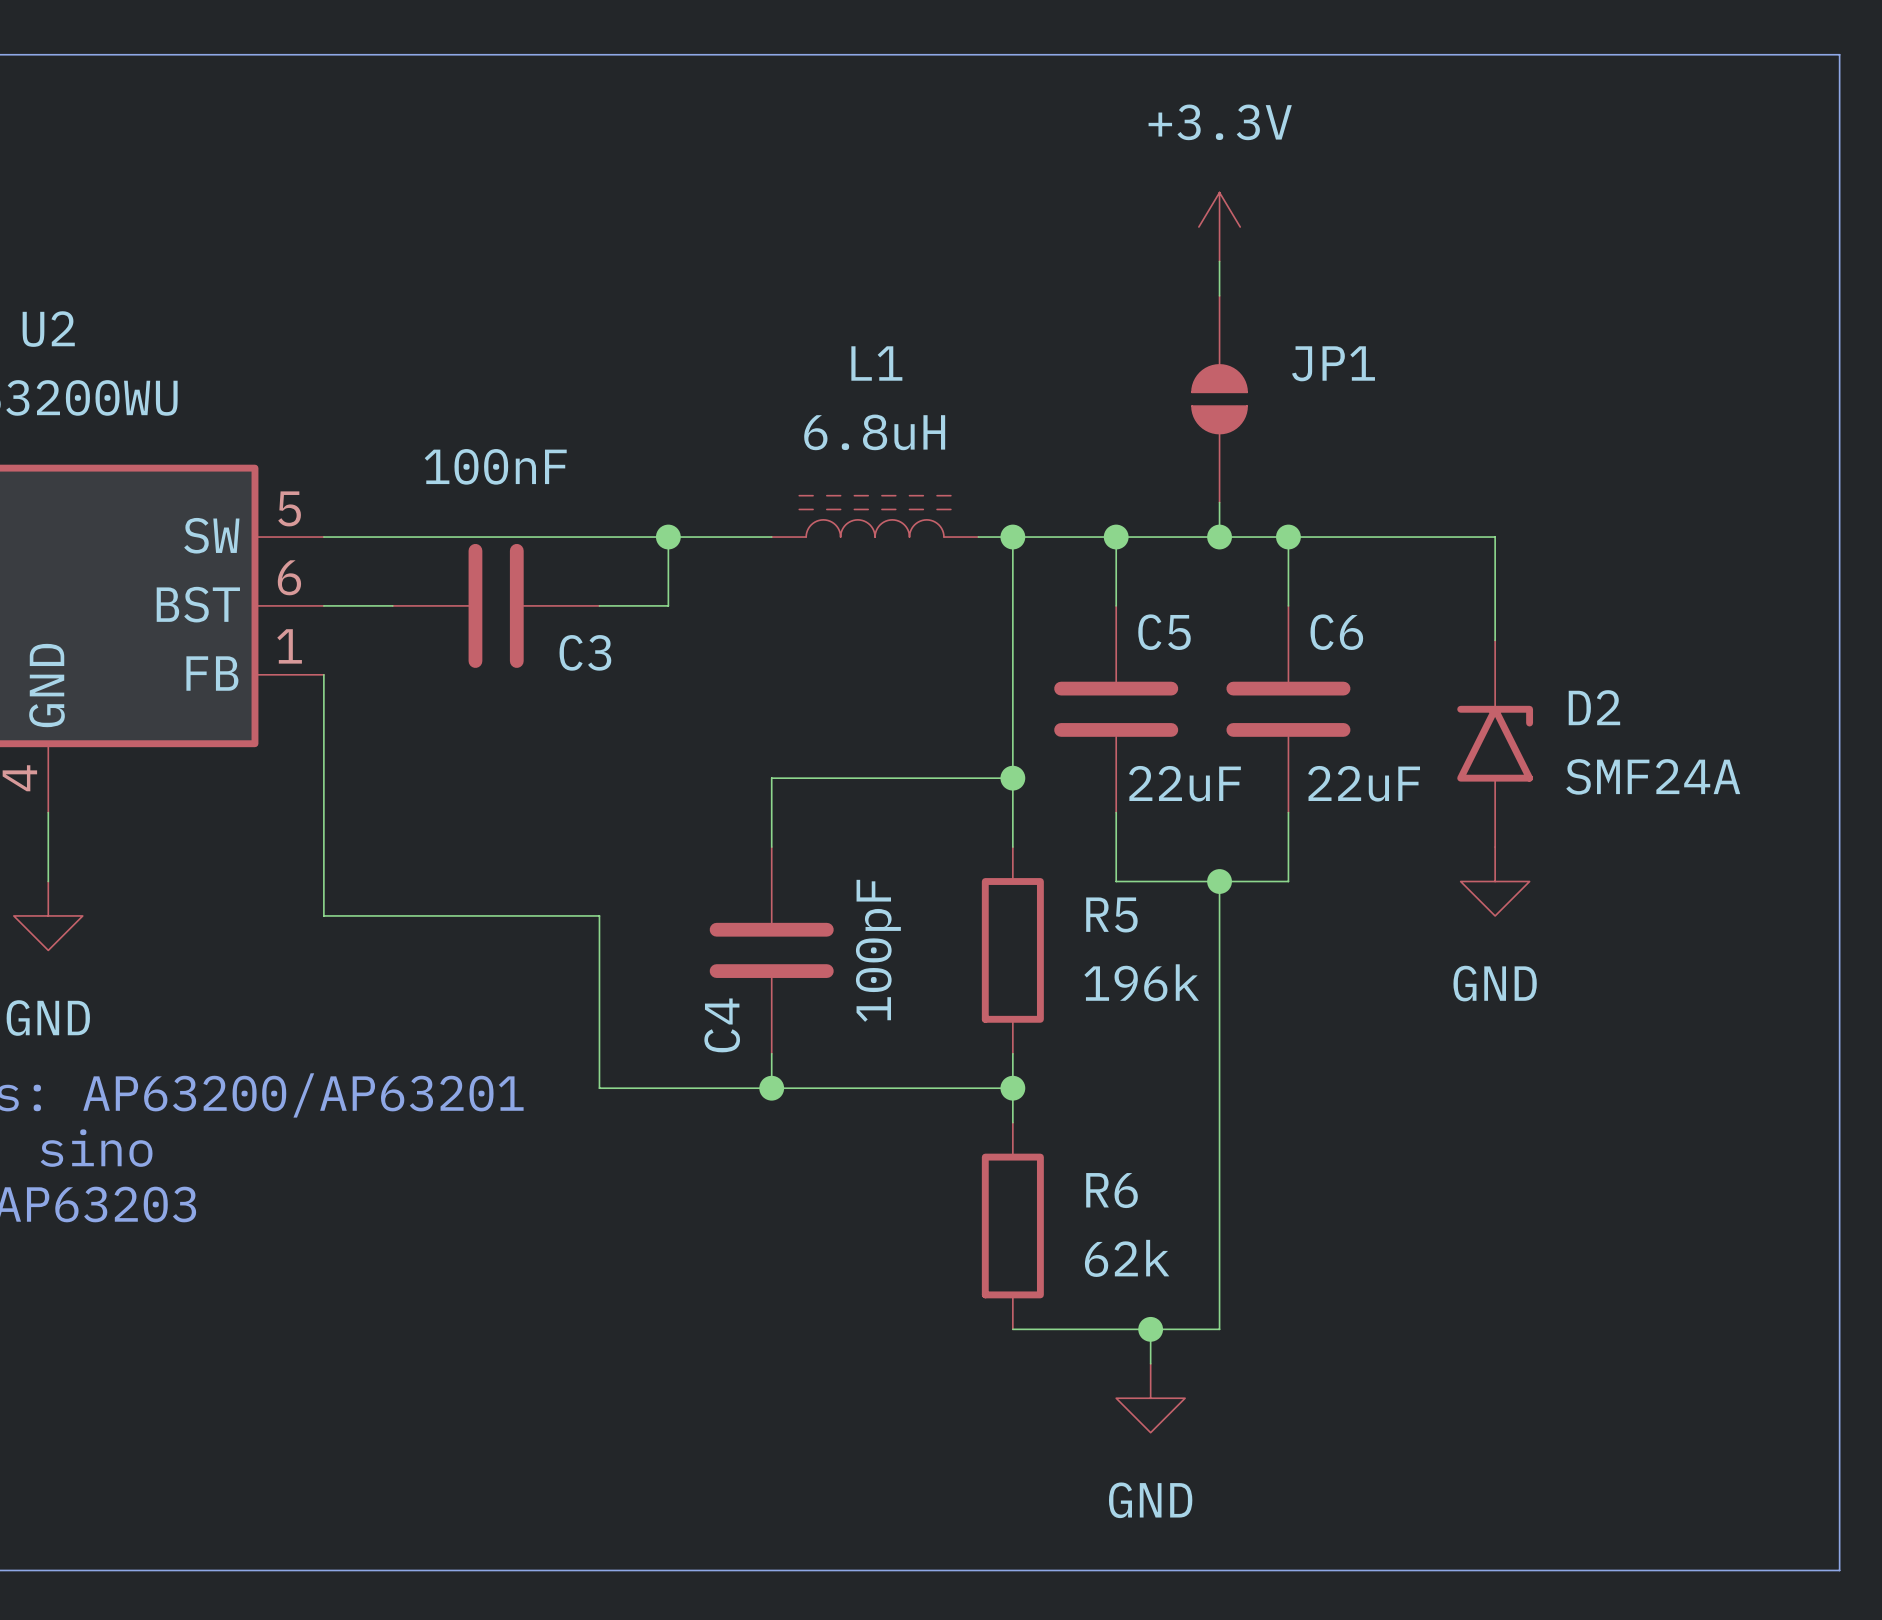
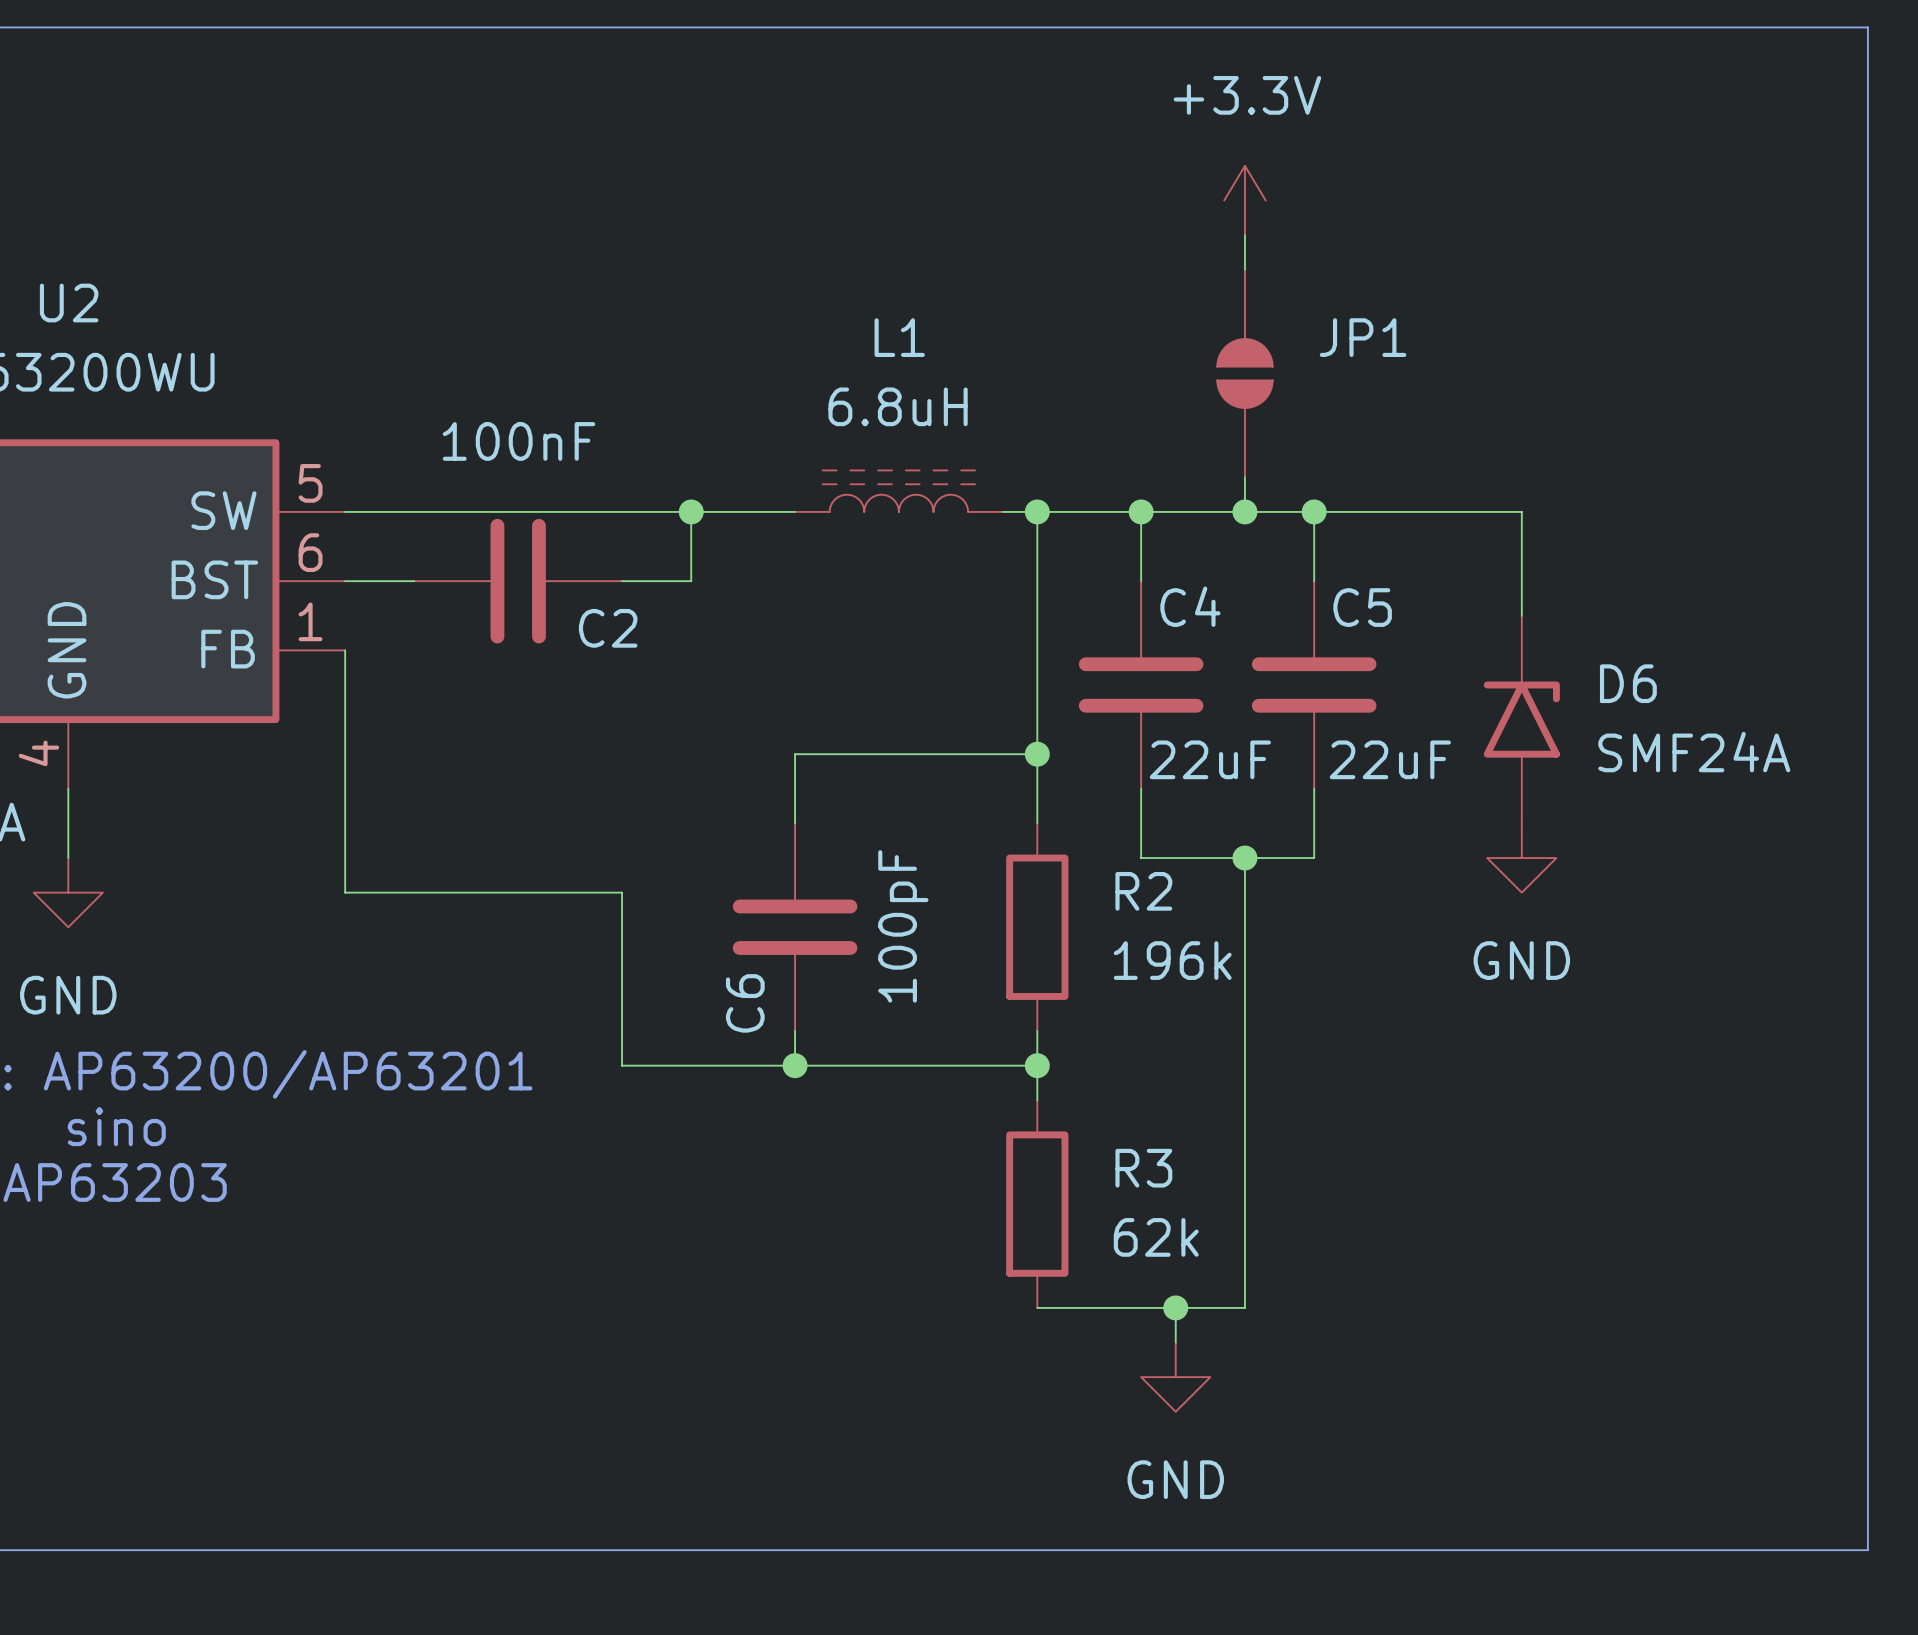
C5 name: C5 (1164, 632) -> C4 (1190, 606)
C6 name: C6 (1336, 632) -> C5 (1362, 607)
C3 name: C3 (585, 652) -> C2 (608, 628)
D2 name: D2 (1594, 707) -> D6 (1628, 683)
R5 name: R5 (1111, 914) -> R2 (1143, 891)
C4 name: C4 (722, 1025) -> C6 (745, 1003)
R6 name: R6 (1112, 1190) -> R3 (1143, 1168)

